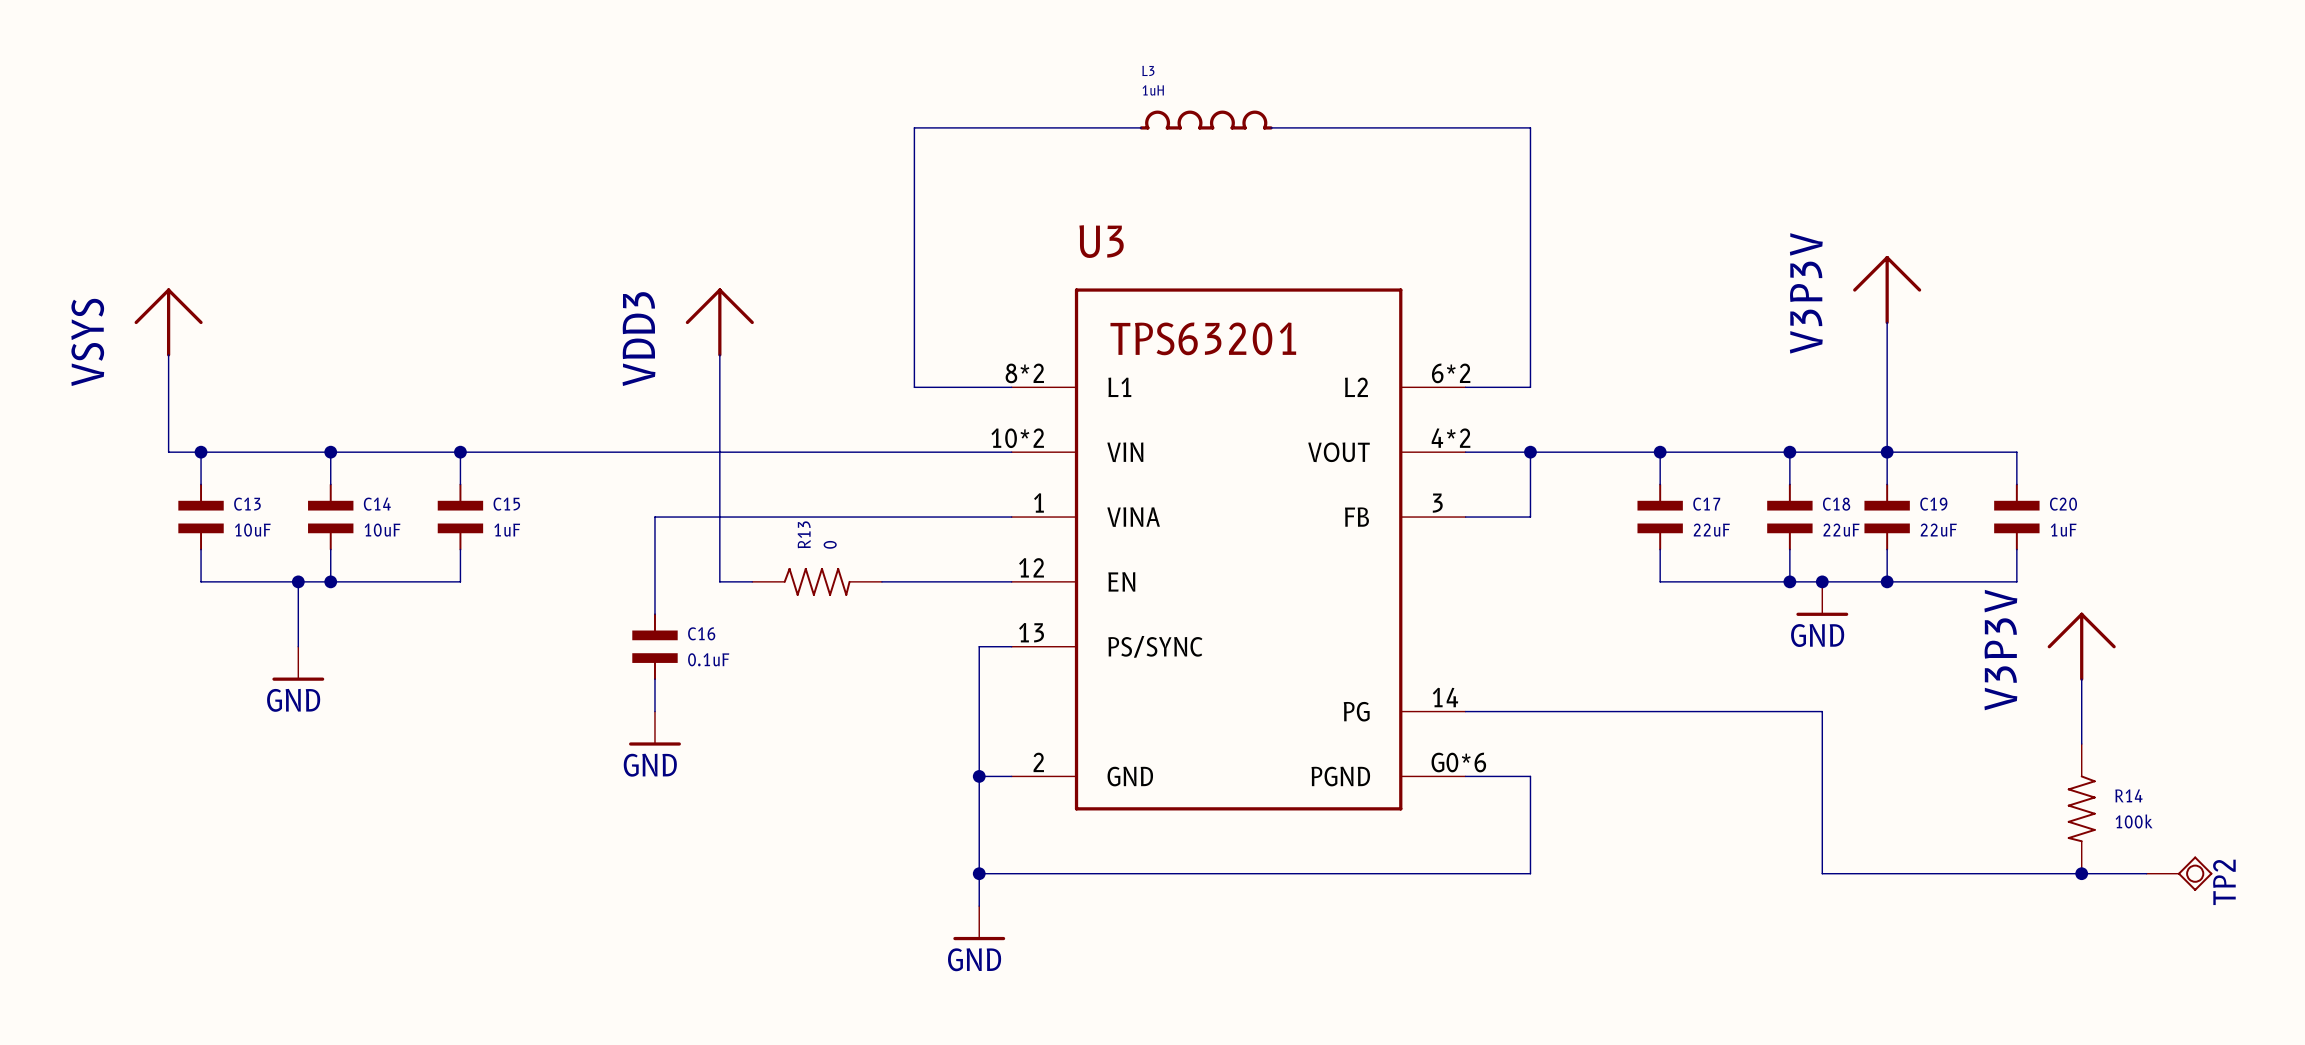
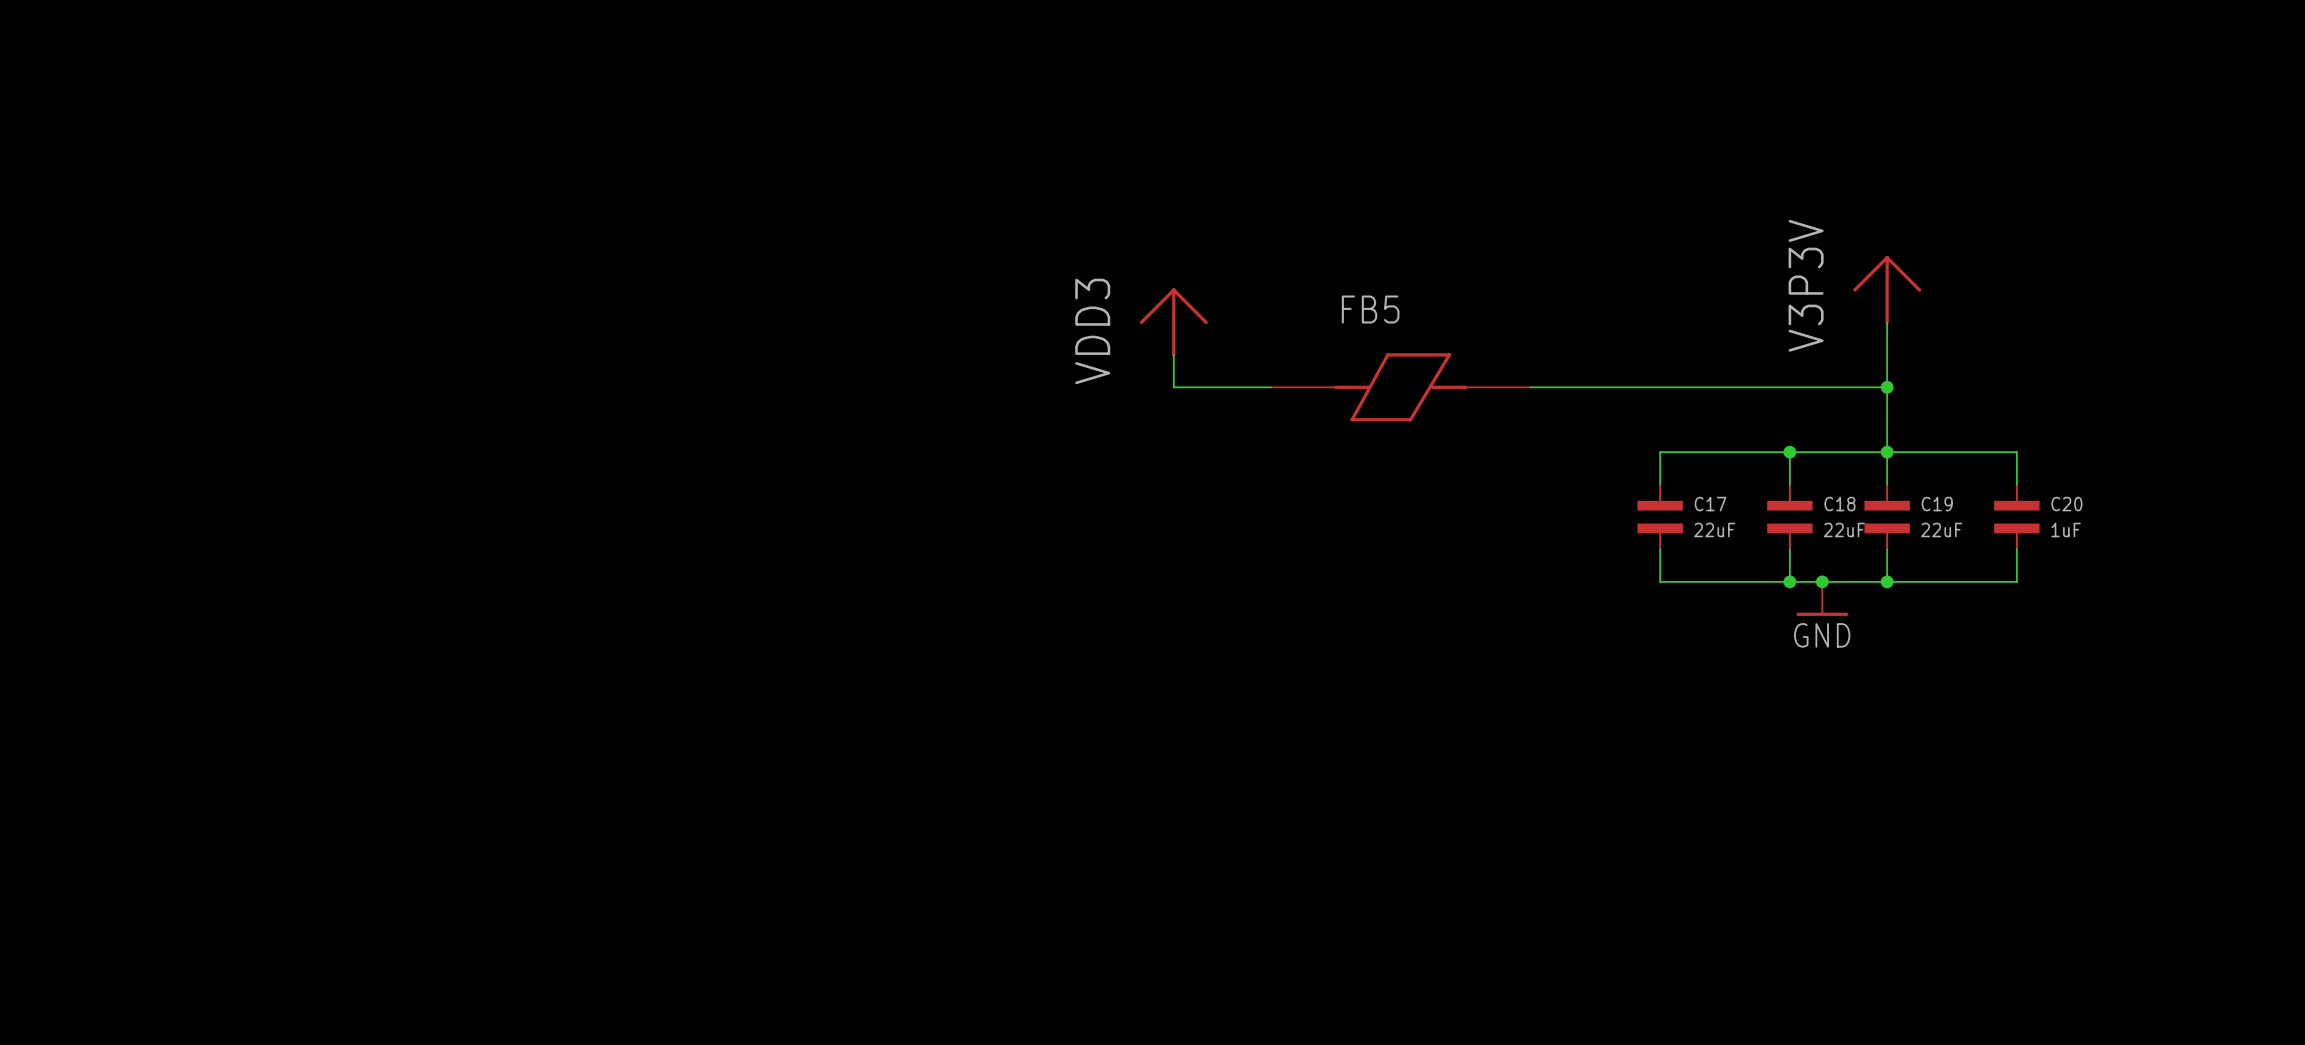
L3: 1uH (1206, 120) -> none
wire: (1141, 127) (914, 127) (914, 387) (1011, 387) -> none
wire: (1271, 127) (1530, 127) (1530, 387) (1465, 387) -> none
power symbol: VSYS (168, 322) -> none
power symbol: VDD3 (719, 322) -> none
power symbol: none -> VDD3 (1173, 322)
wire: (168, 354) (168, 452) (1011, 452) -> none
wire: (719, 354) (719, 581) (752, 581) -> none
wire: none -> (1173, 354) (1173, 387) (1271, 387)
FB5: none -> (1400, 387)
wire: none -> (1530, 387) (1887, 387)
junction: none -> (1887, 387)
wire: (201, 452) (201, 484) -> none
junction: (201, 452) -> none
wire: (330, 452) (330, 484) -> none
junction: (330, 452) -> none
wire: (460, 452) (460, 484) -> none
junction: (460, 452) -> none
wire: (1465, 452) (1660, 452) -> none
wire: (1530, 452) (1530, 517) (1465, 517) -> none
junction: (1530, 452) -> none
junction: (1660, 452) -> none
C13: 10uF (201, 517) -> none
C14: 10uF (330, 517) -> none
C15: 1uF (460, 517) -> none
wire: (1011, 517) (654, 517) (654, 614) -> none
wire: (201, 549) (201, 581) (460, 581) (460, 549) -> none
wire: (330, 549) (330, 581) -> none
U3: (1238, 549) -> none
wire: (298, 581) (298, 646) -> none
junction: (298, 581) -> none
junction: (330, 581) -> none
R13: 0 (817, 581) -> none
wire: (881, 581) (1011, 581) -> none
C16: 0.1uF (654, 646) -> none
wire: (1011, 646) (979, 646) (979, 906) -> none
power symbol: V3P3V (2081, 646) -> none
power symbol: GND (298, 663) -> none
wire: (654, 679) (654, 711) -> none
wire: (2081, 679) (2081, 744) -> none
wire: (1465, 711) (1822, 711) (1822, 873) (2146, 873) -> none
power symbol: GND (654, 728) -> none
wire: (979, 776) (1011, 776) -> none
junction: (979, 776) -> none
wire: (1465, 776) (1530, 776) (1530, 873) (979, 873) -> none
R14: 100k (2081, 808) -> none
junction: (979, 873) -> none
junction: (2081, 873) -> none
TP2: (2179, 873) -> none
power symbol: GND (979, 923) -> none

